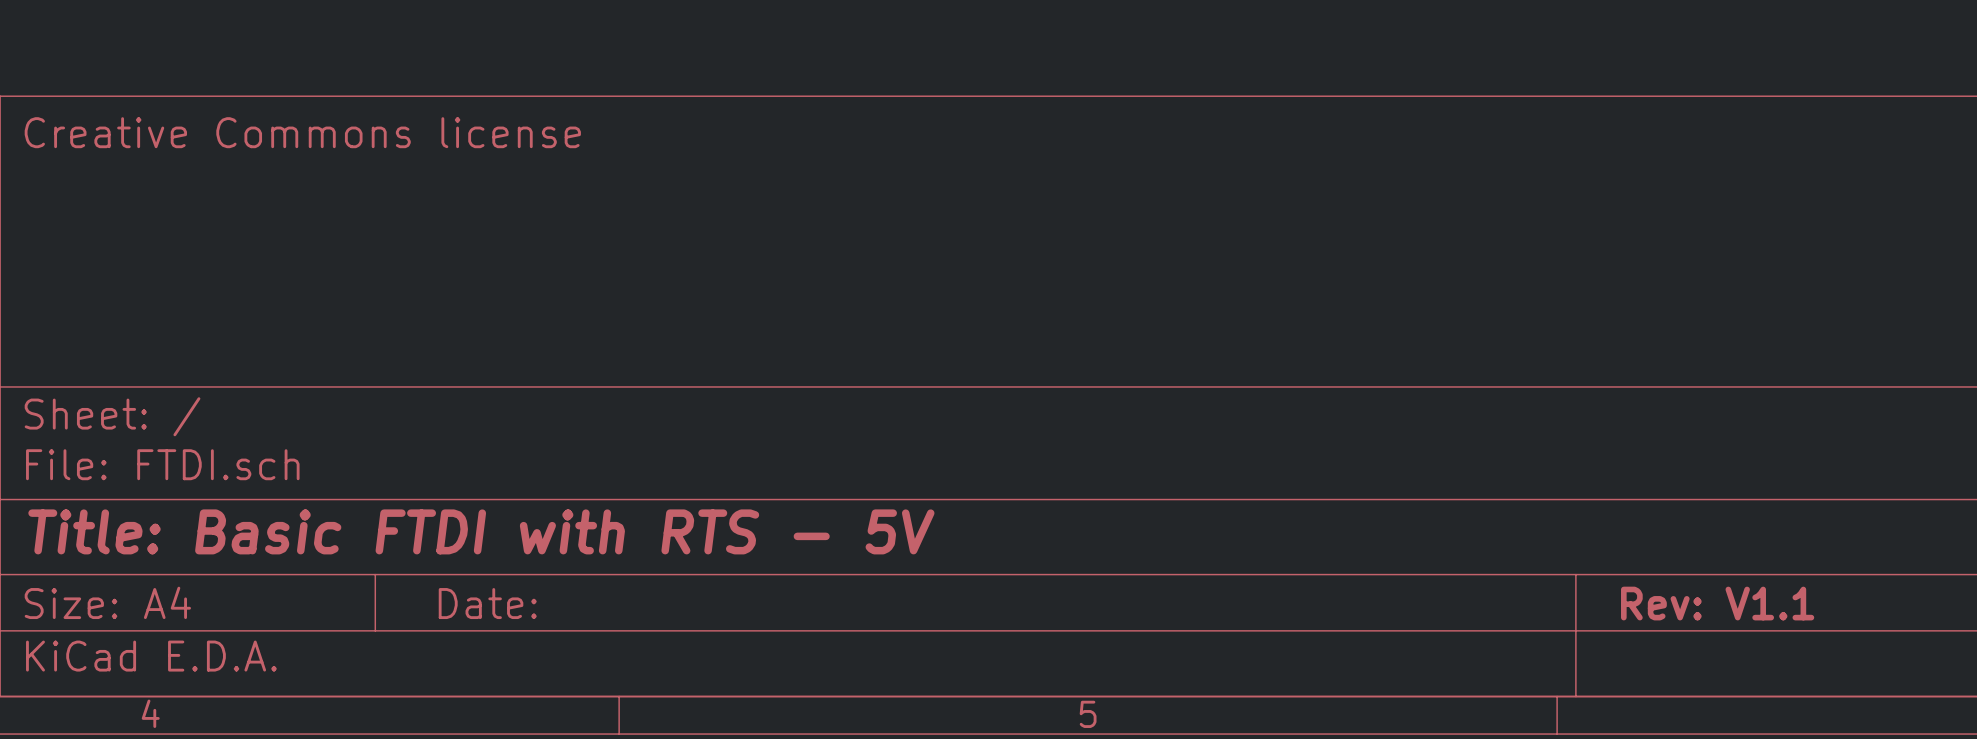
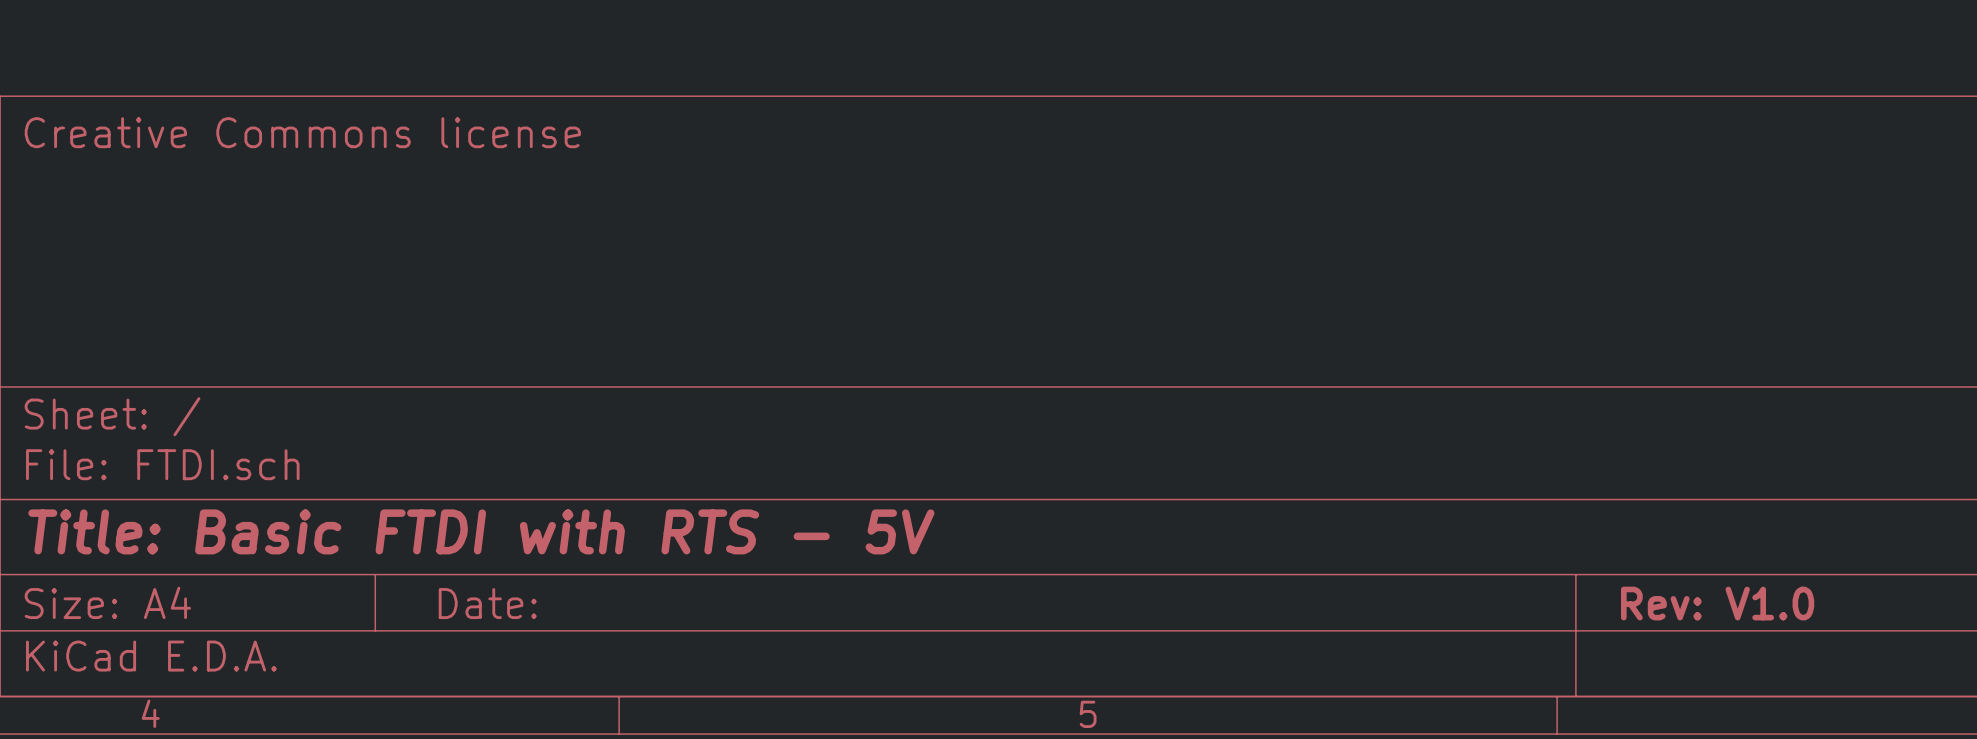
title block: Rev: V1.1 (1717, 603) -> Rev: V1.0 (1717, 603)

